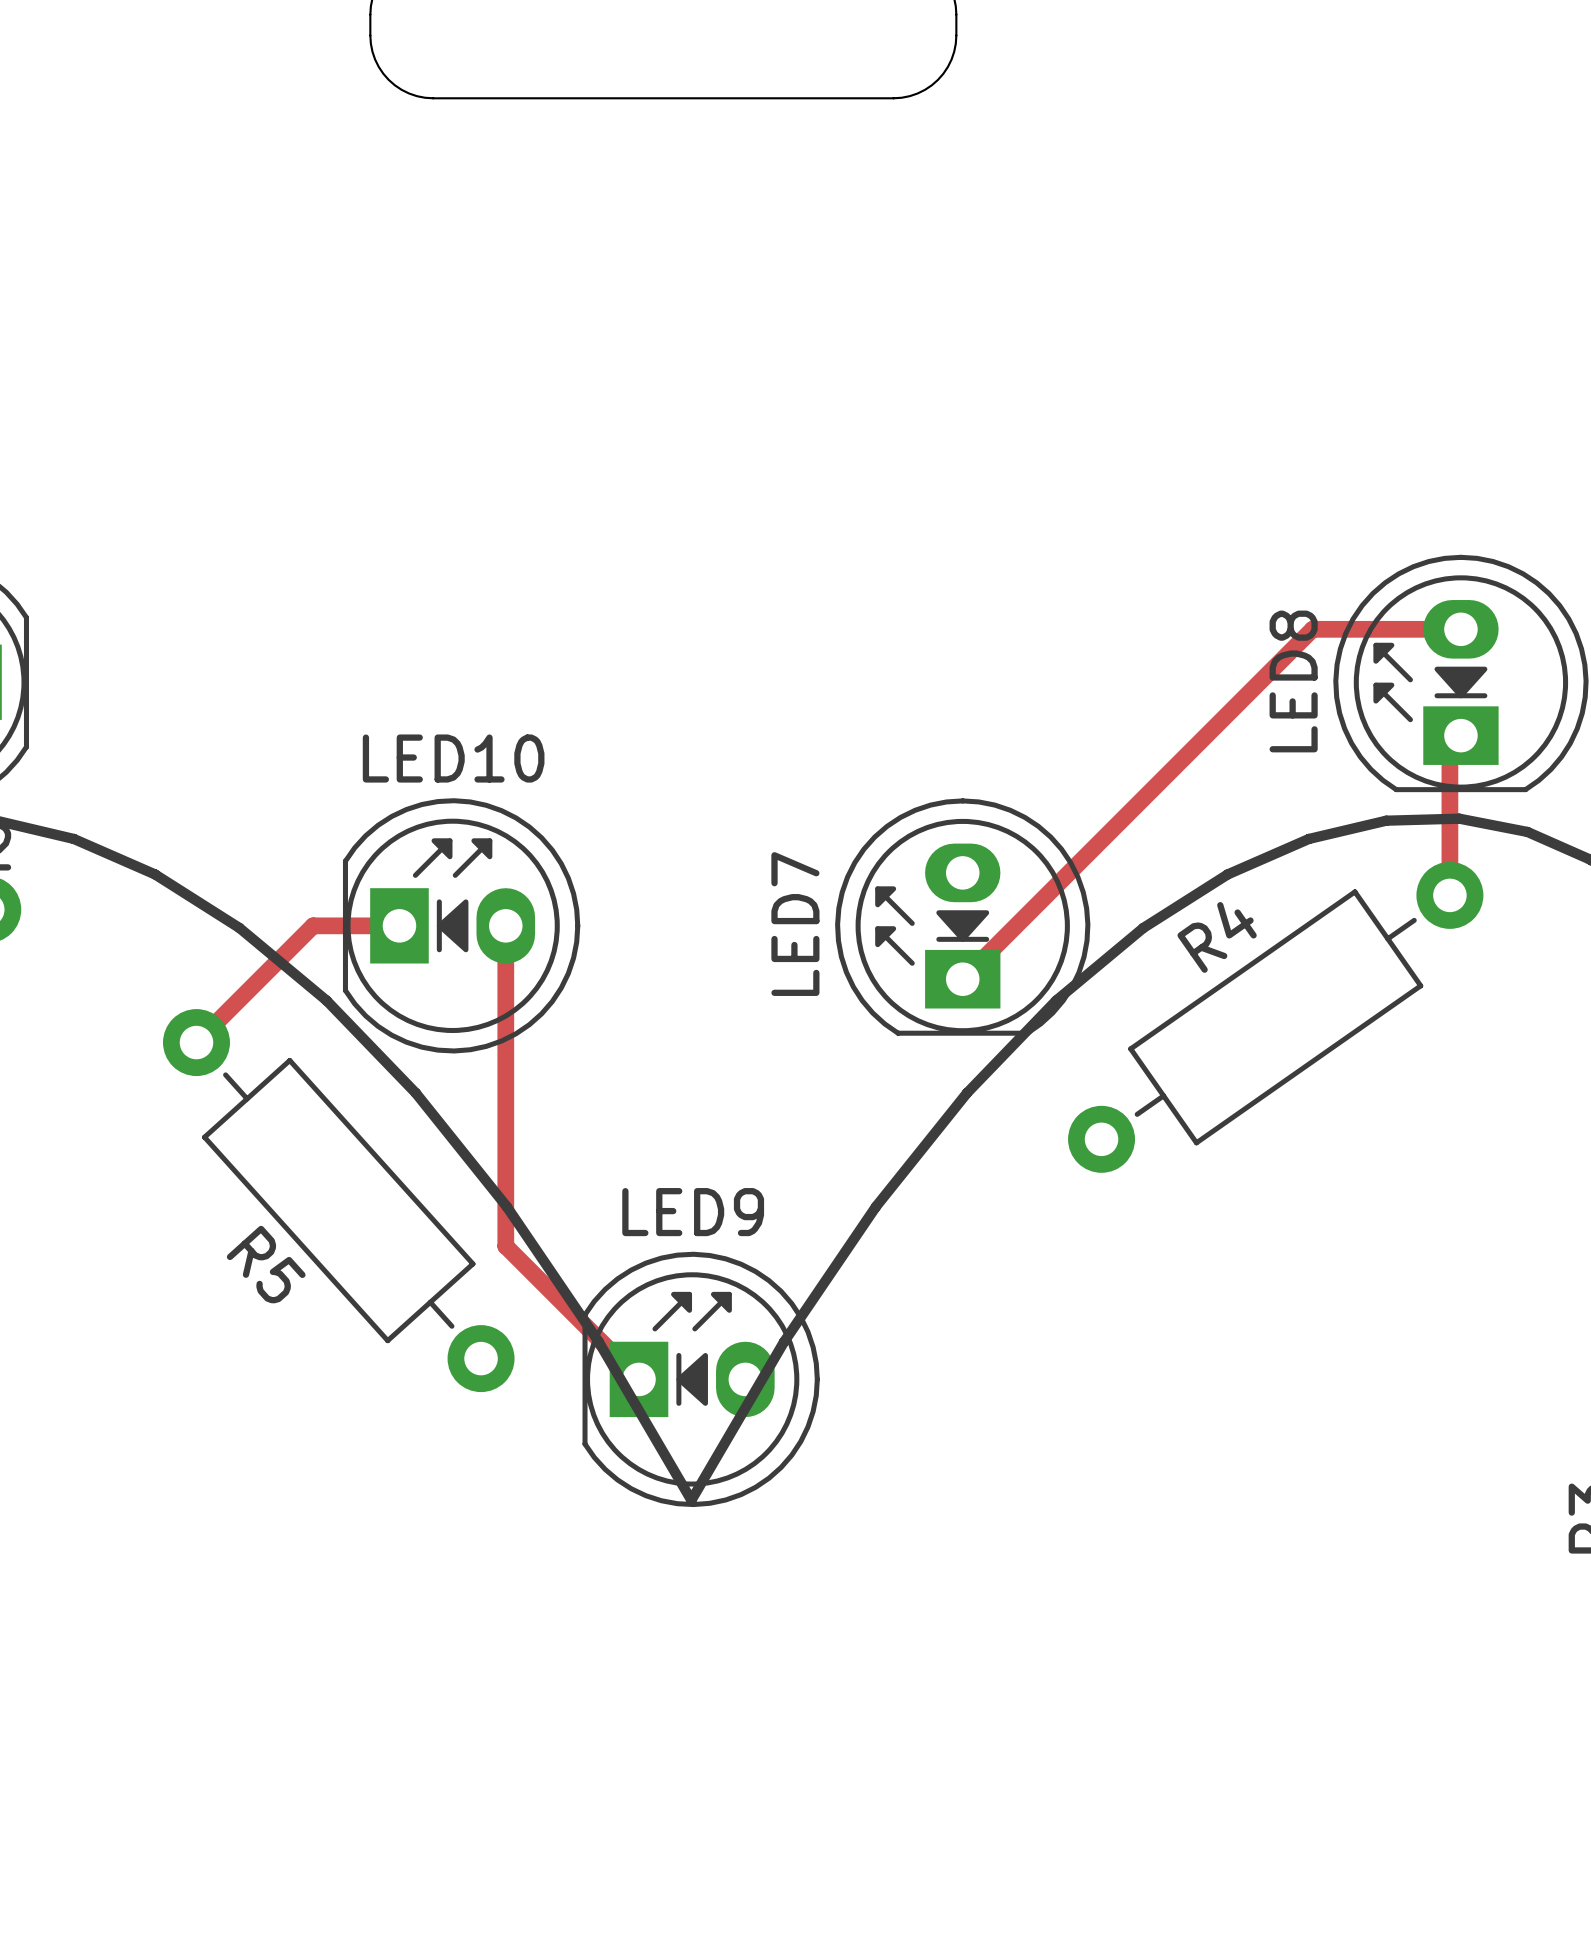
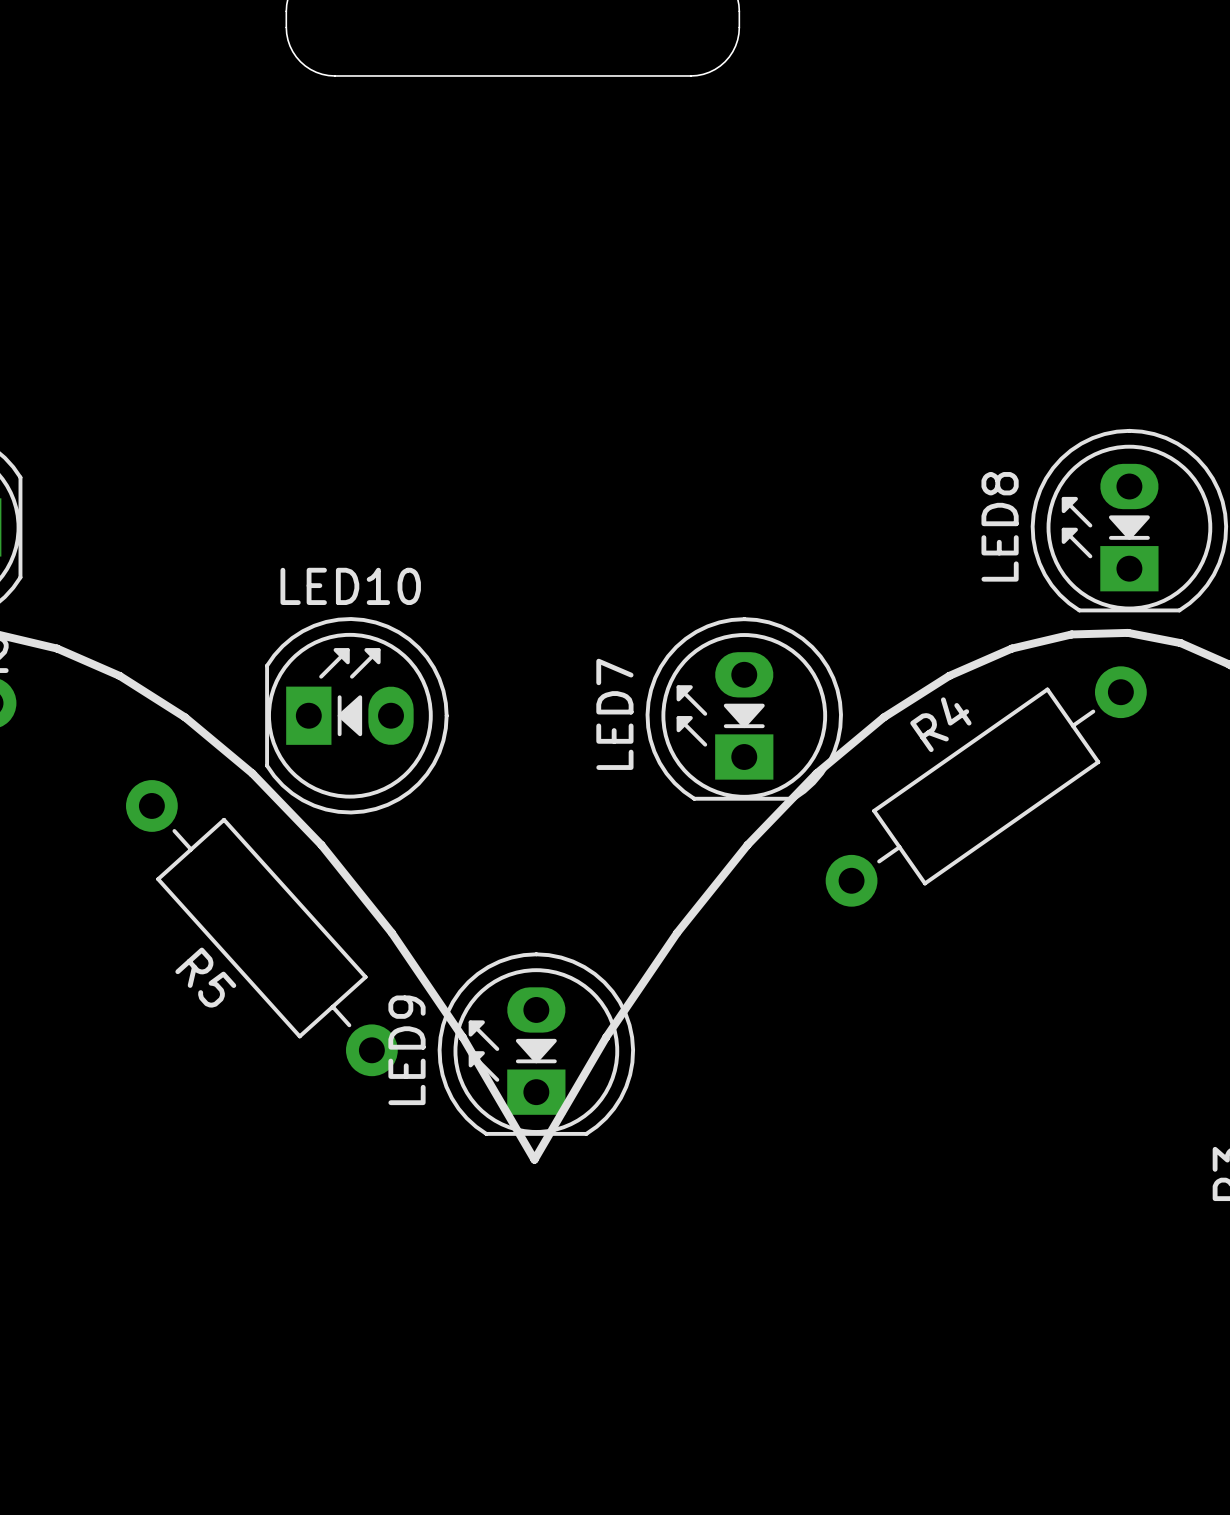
top track: (1460, 629) (1312, 629) (962, 979) -> none
top track: (1460, 735) (1449, 746) (1449, 895) -> none
top track: (399, 925) (313, 925) (196, 1042) -> none
top track: (505, 925) (505, 1246) (639, 1379) -> none
LED9 name position: LED9 (693, 1212) -> LED9 (407, 1050)
LED9 footprint: [582, 1251, 820, 1508] -> [437, 952, 636, 1136]

